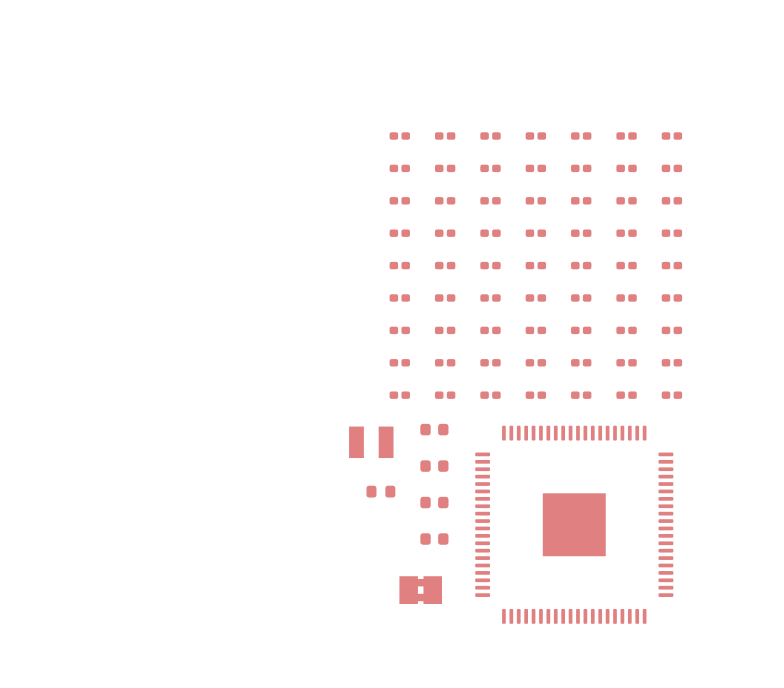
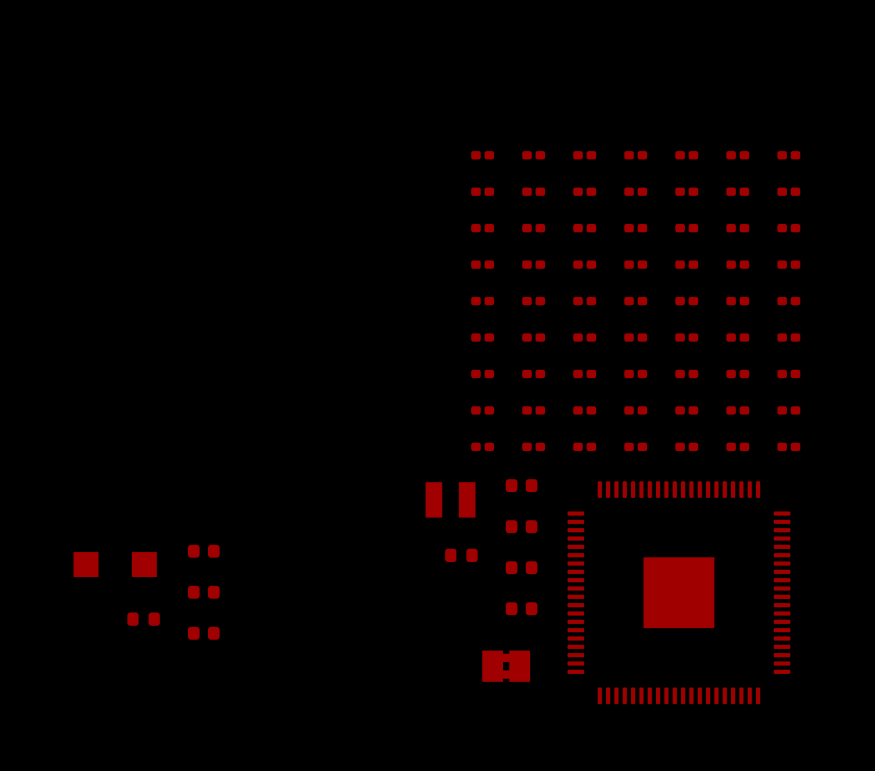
part: none -> (203, 551)
part: none -> (115, 564)
part: none -> (203, 592)
part: none -> (143, 619)
part: none -> (203, 633)

